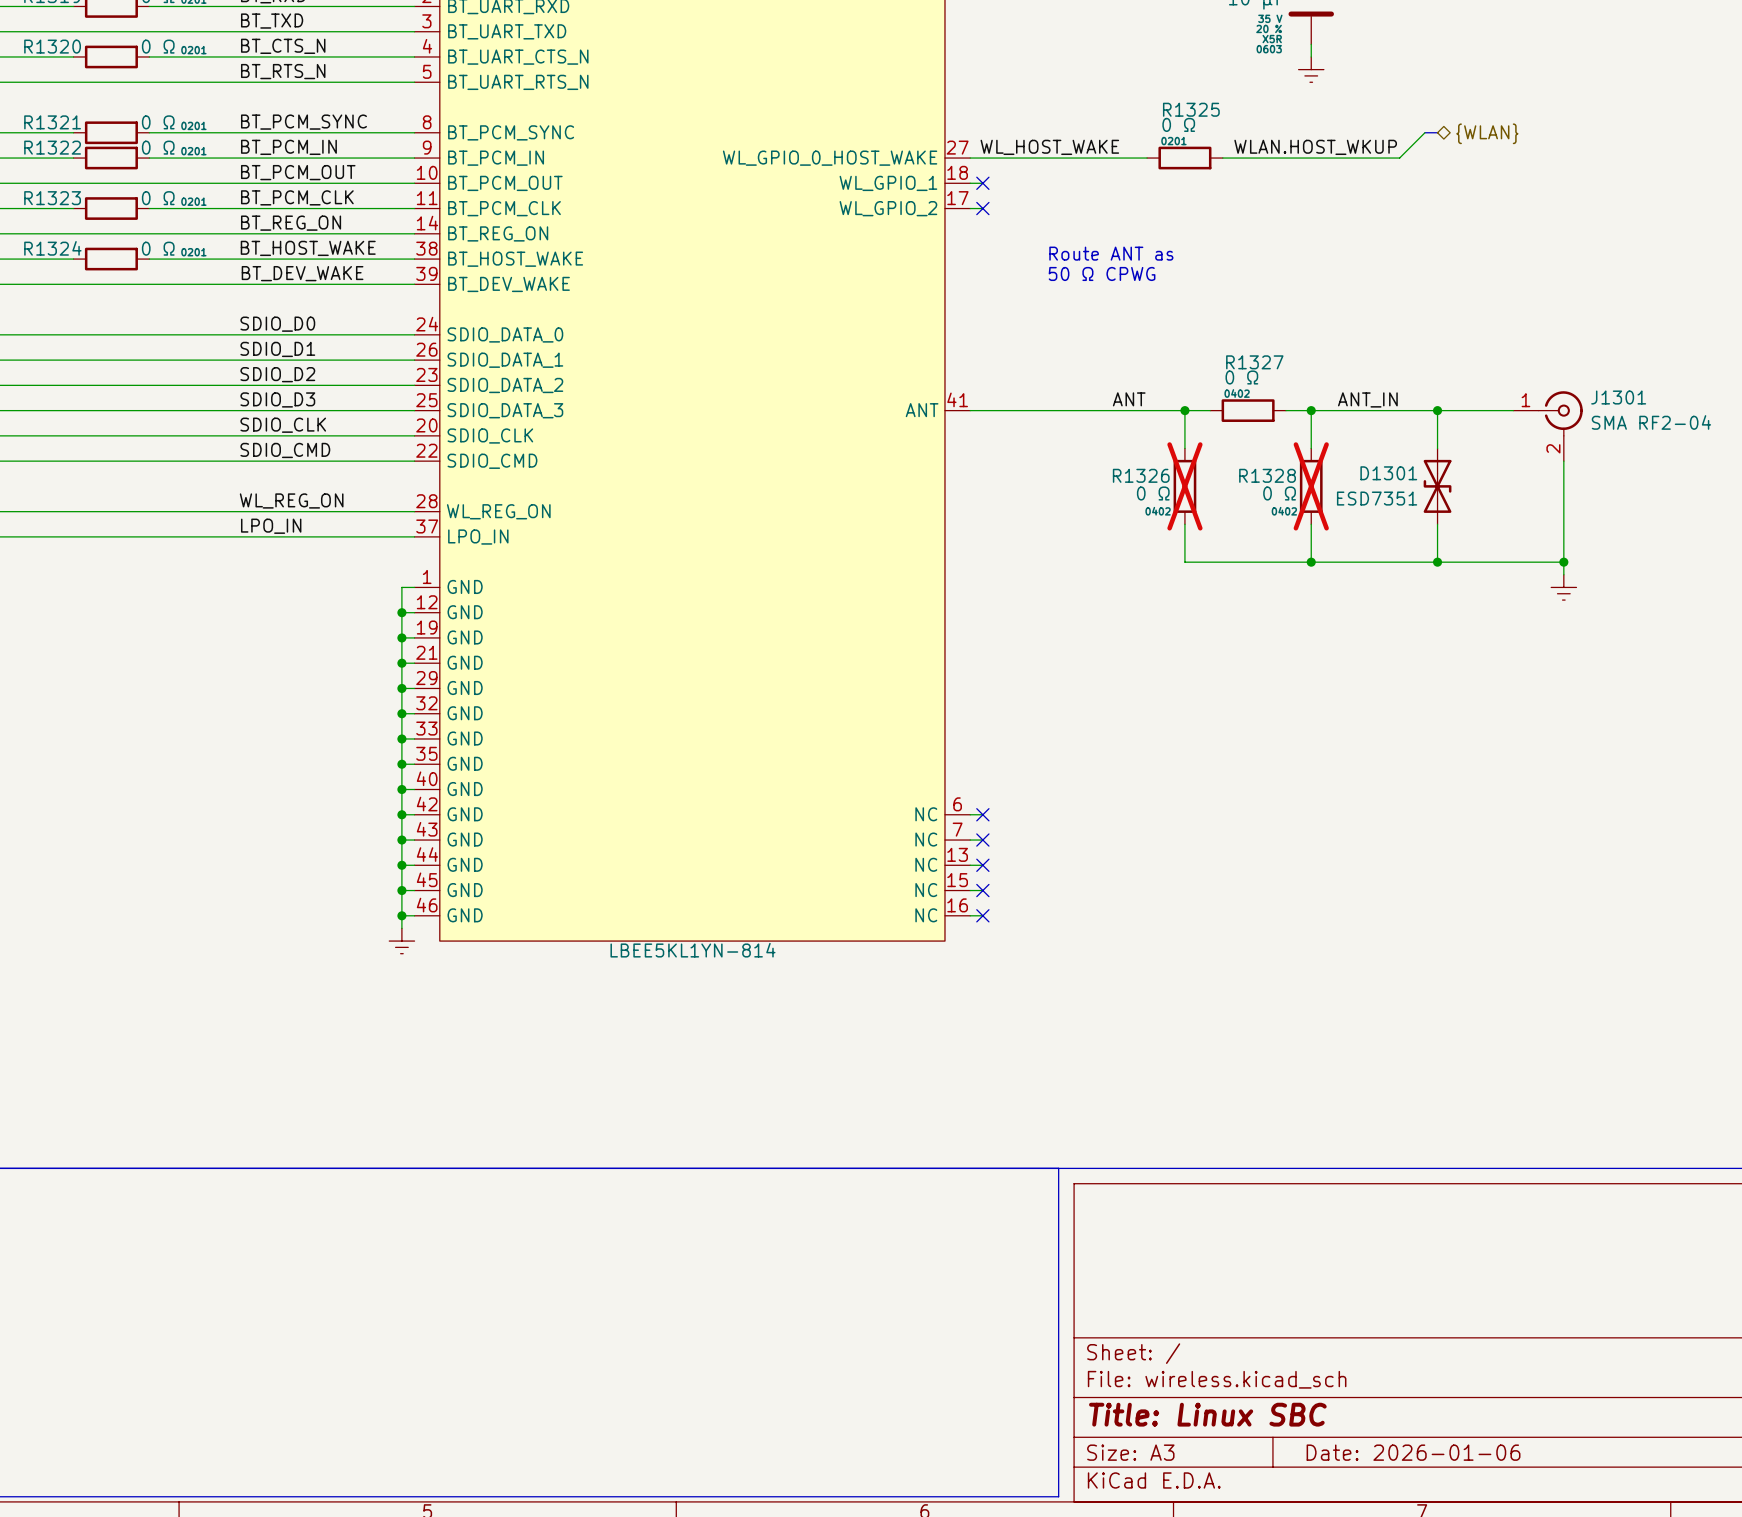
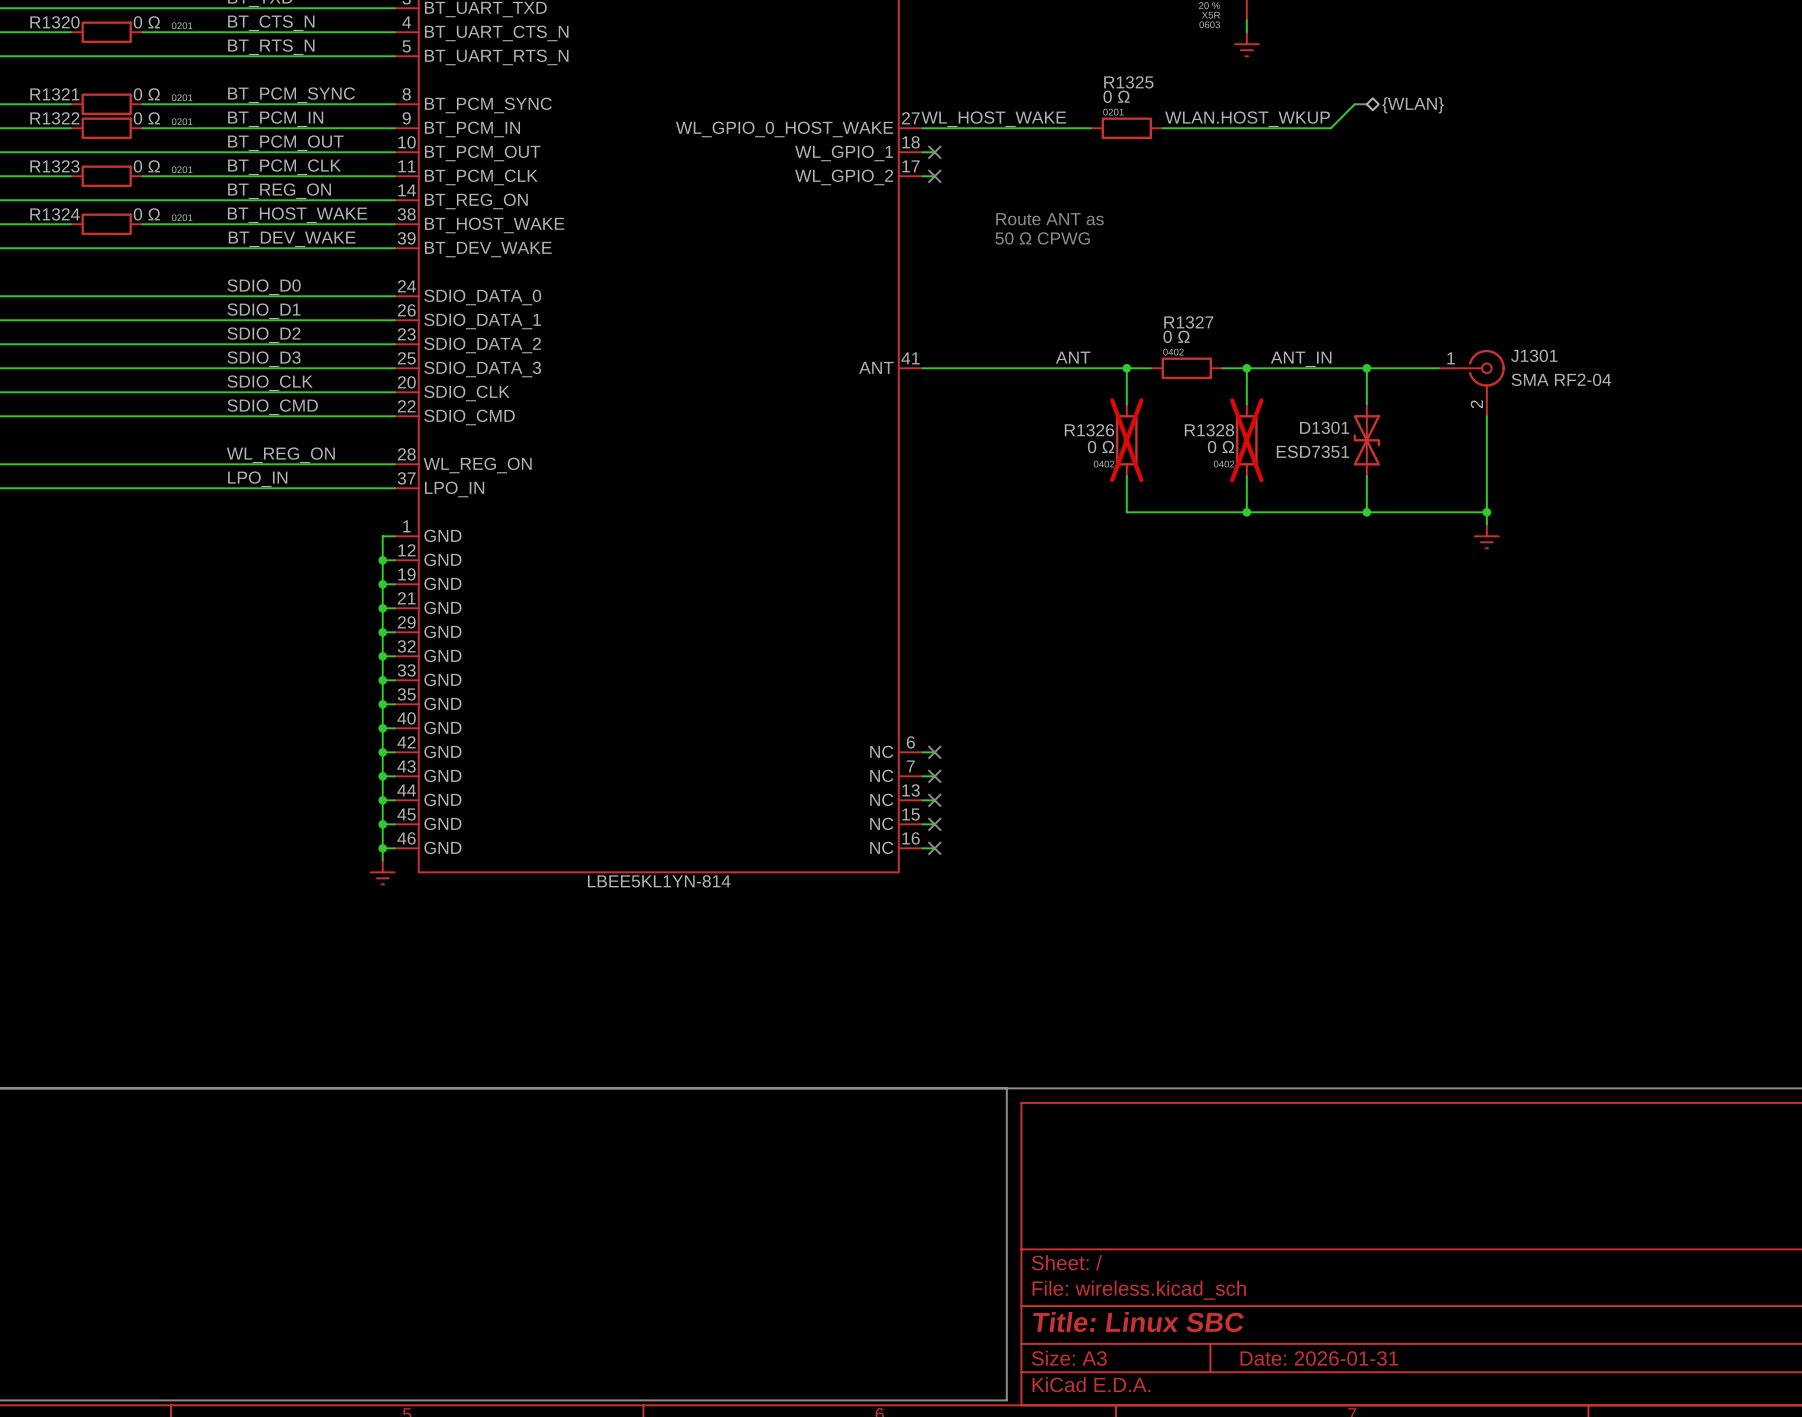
title block: Date: 2026-01-06 (1413, 1452) -> Date: 2026-01-31 (1319, 1358)

